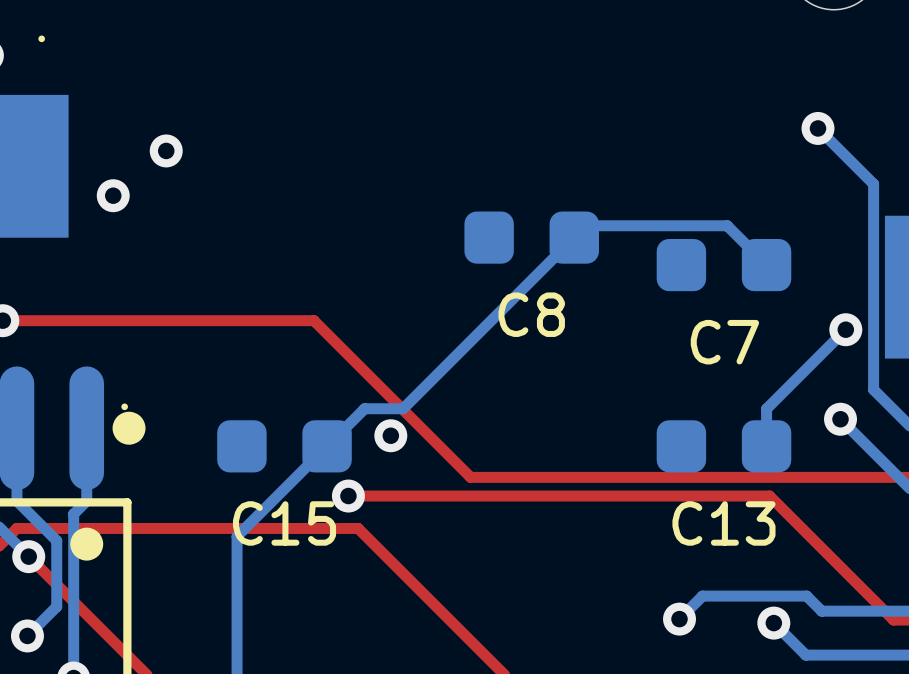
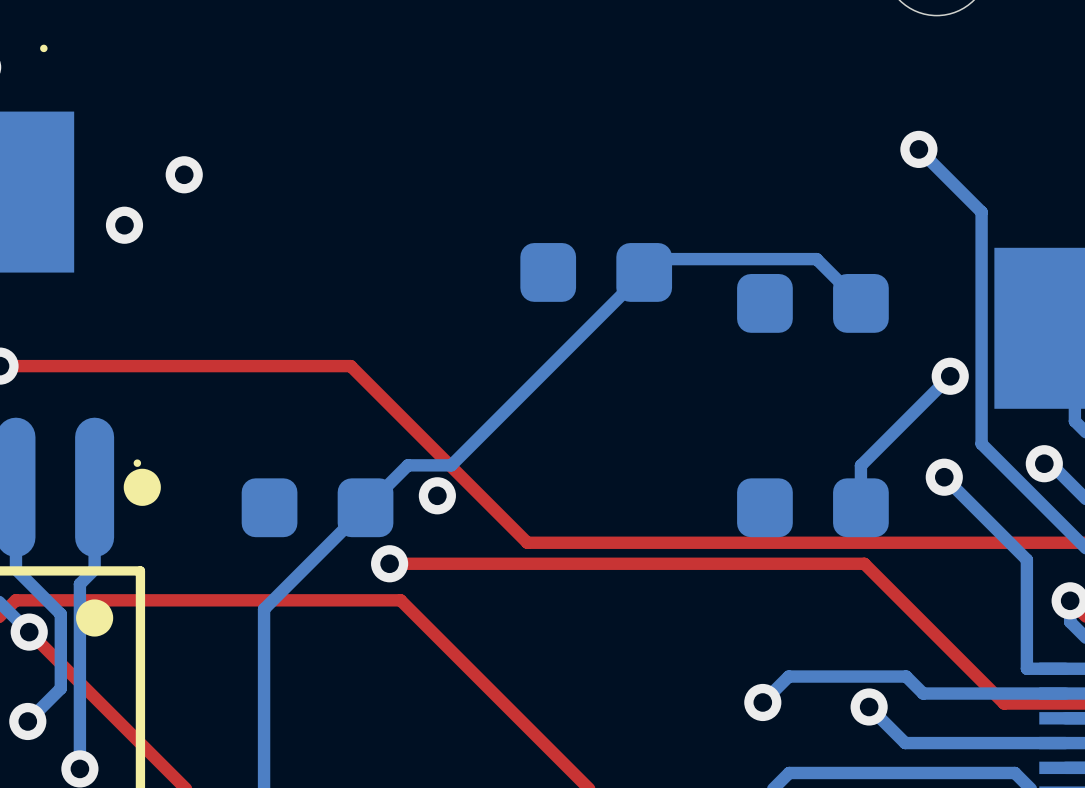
C8 name: C8 (531, 314) -> none
C7 name: C7 (724, 342) -> none
C15 name: C15 (284, 523) -> none
C13 name: C13 (723, 523) -> none

